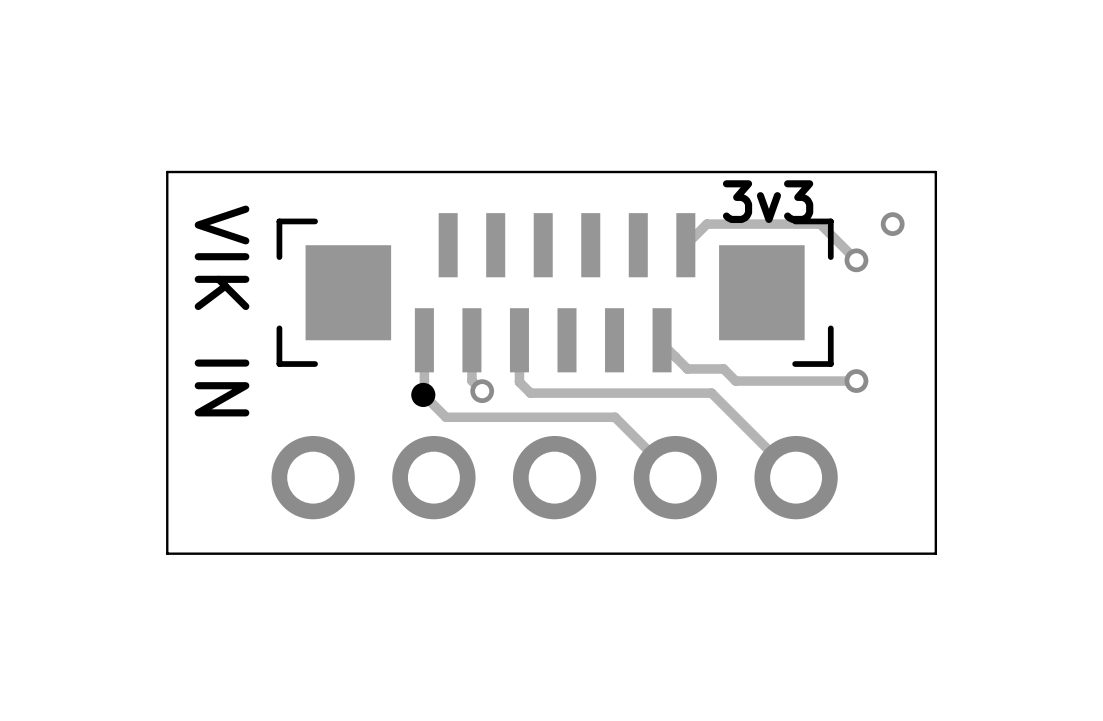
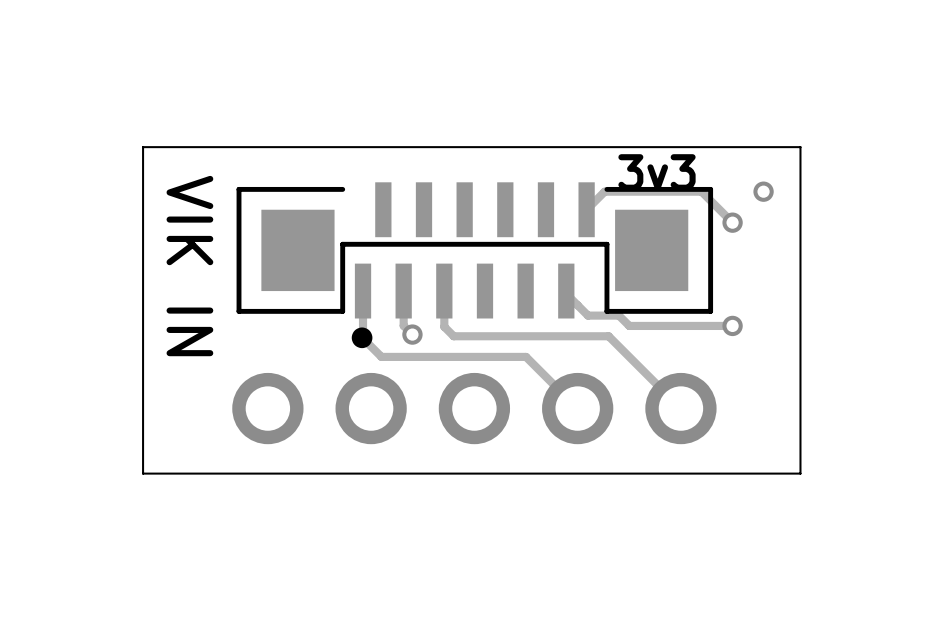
part footprint: [276, 213, 834, 408] -> [236, 182, 714, 349]

